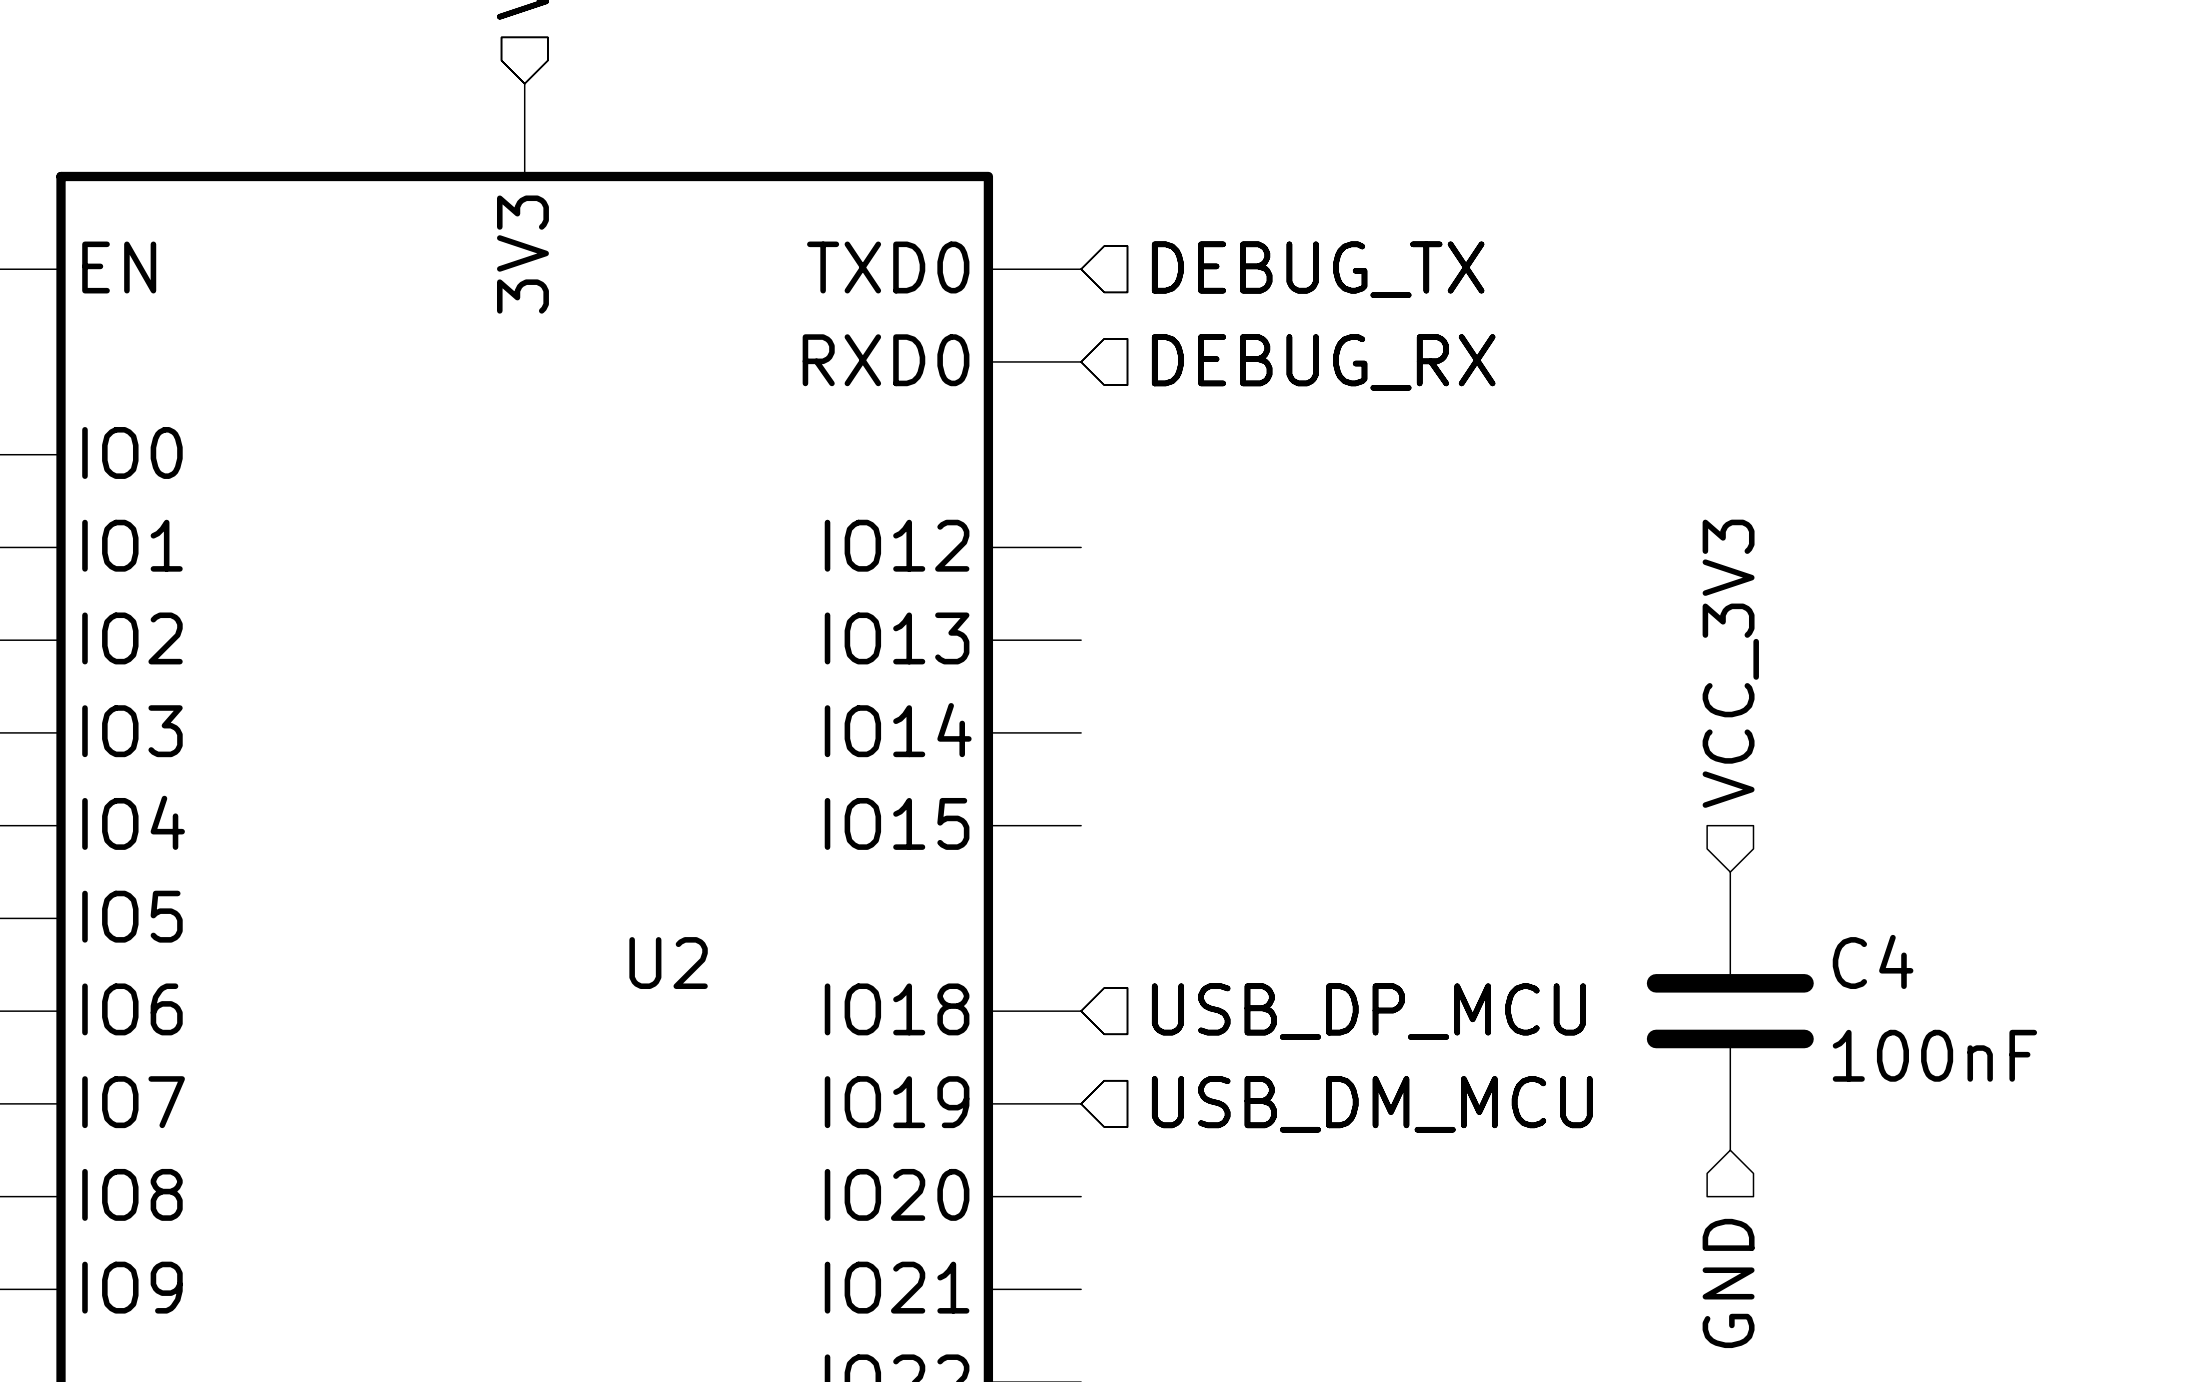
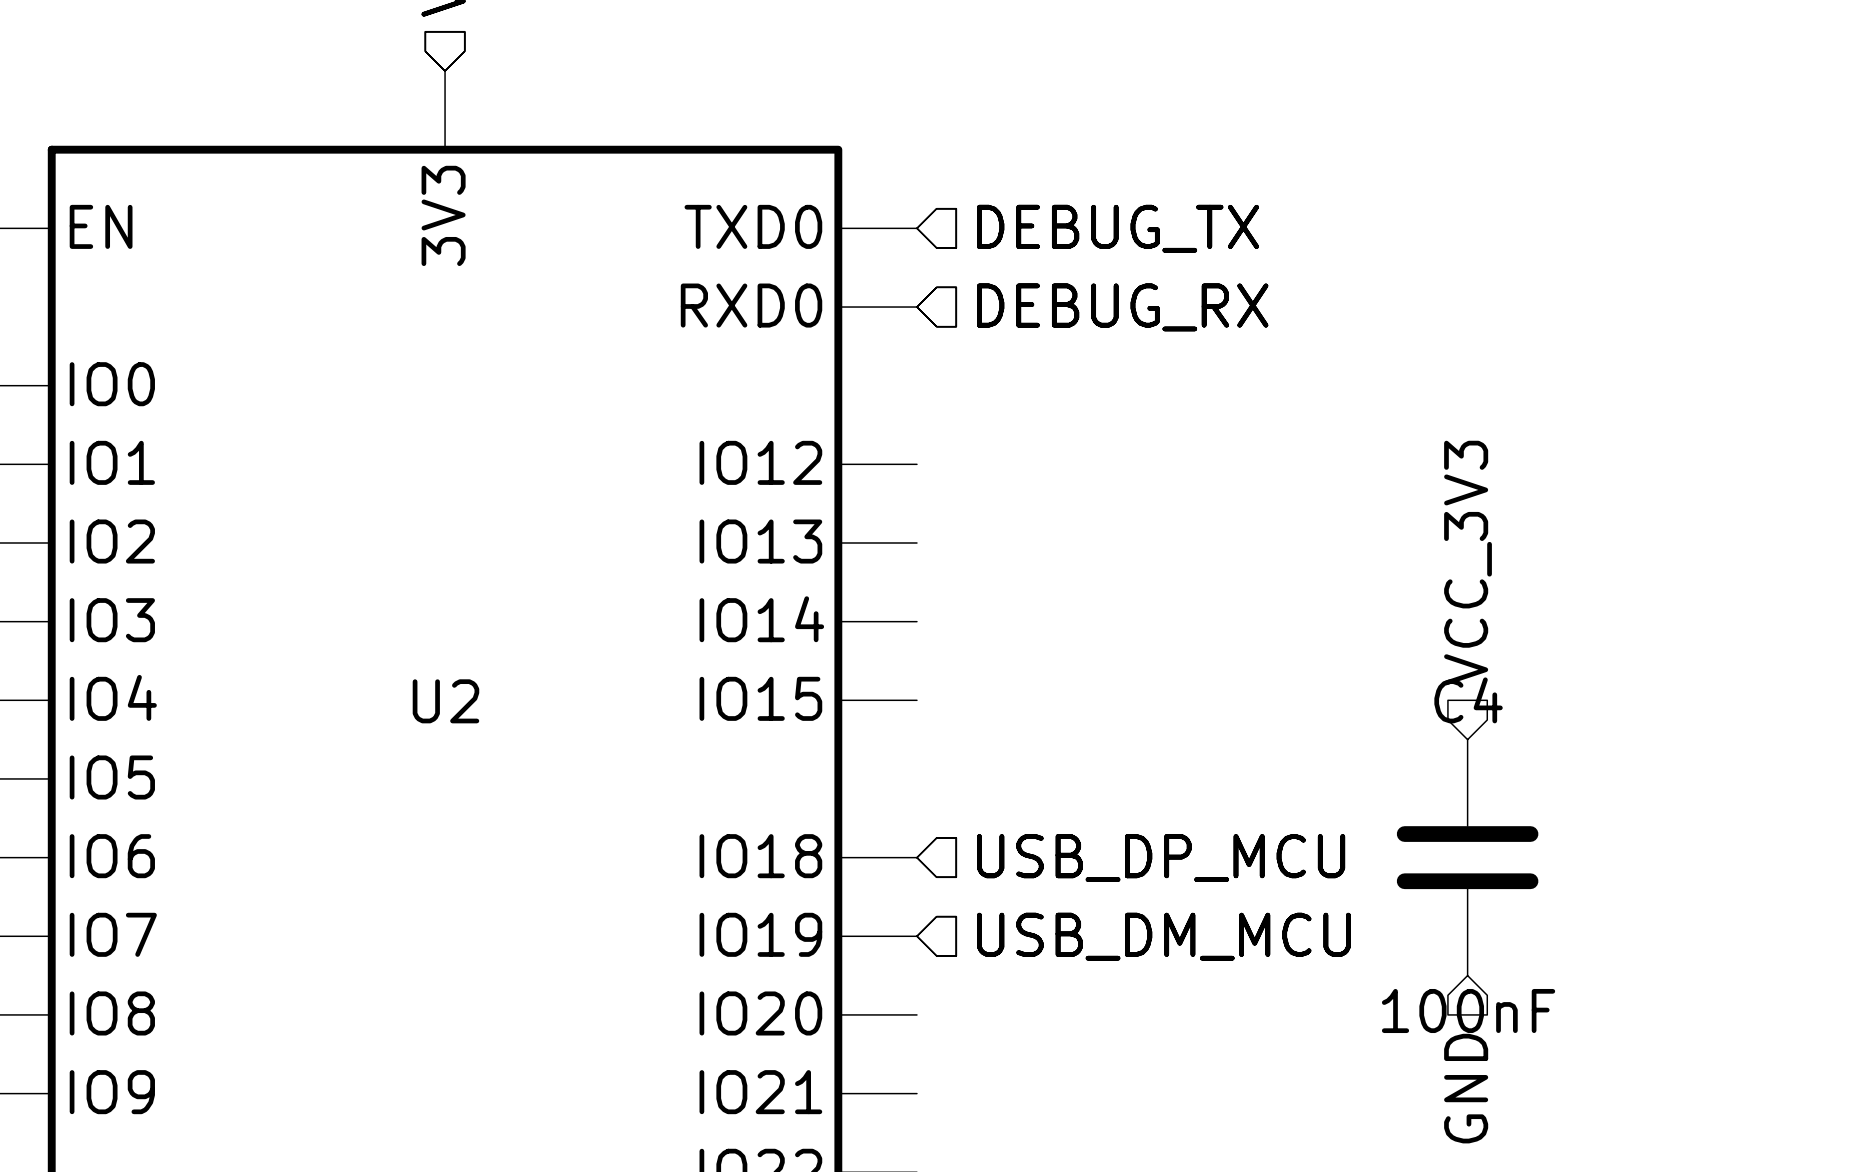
C4 name position: C4 (1873, 961) -> C4 (1468, 700)
U2 name position: U2 (668, 963) -> U2 (445, 701)
C4 value position: 100nF (1934, 1055) -> 100nF (1468, 1011)

